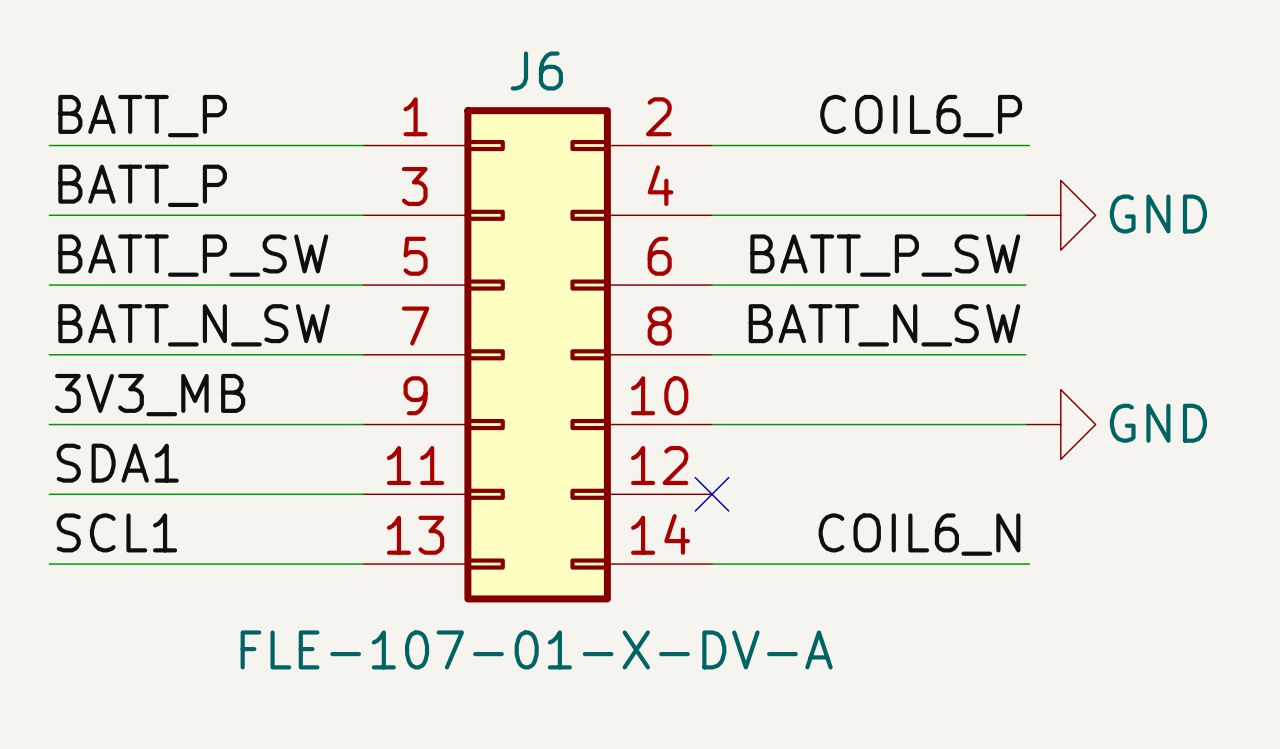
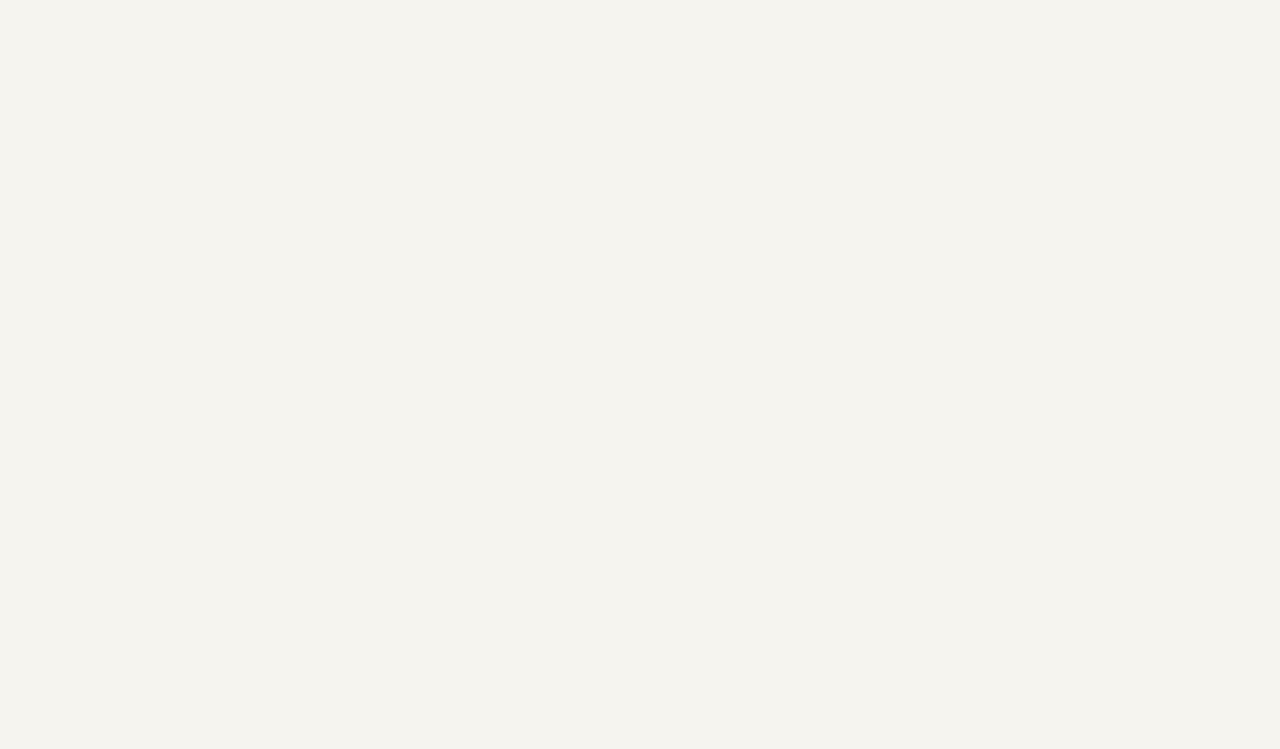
label: BATT_P (142, 116) -> none
label: COIL6_P (921, 116) -> none
wire: (49, 145) (363, 145) -> none
wire: (712, 145) (1029, 145) -> none
label: BATT_P (142, 185) -> none
wire: (49, 215) (363, 215) -> none
wire: (712, 215) (1025, 215) -> none
power symbol: GND (1060, 215) -> none
label: BATT_P_SW (193, 255) -> none
label: BATT_P_SW (885, 255) -> none
wire: (49, 285) (363, 285) -> none
wire: (712, 285) (1025, 285) -> none
label: BATT_N_SW (194, 325) -> none
label: BATT_N_SW (884, 325) -> none
wire: (49, 354) (363, 354) -> none
J6: FLE-107-01-X-DV-A (537, 354) -> none
wire: (712, 354) (1025, 354) -> none
label: 3V3_MB (150, 395) -> none
wire: (49, 424) (363, 424) -> none
wire: (712, 424) (1025, 424) -> none
power symbol: GND (1060, 424) -> none
label: SDA1 (117, 463) -> none
wire: (49, 494) (363, 494) -> none
no-connect mark: (712, 494) -> none
label: SCL1 (116, 532) -> none
label: COIL6_N (919, 534) -> none
wire: (49, 564) (363, 564) -> none
wire: (712, 564) (1029, 564) -> none

